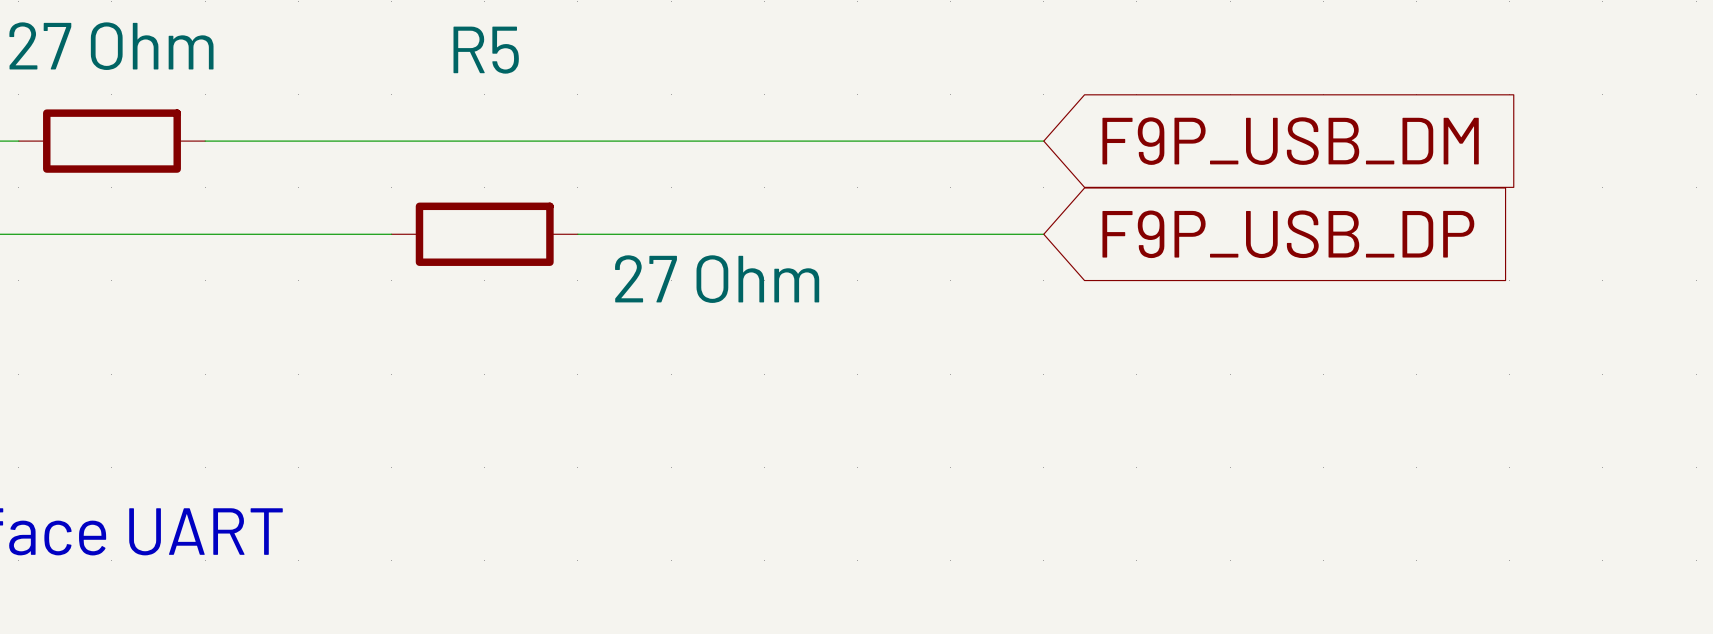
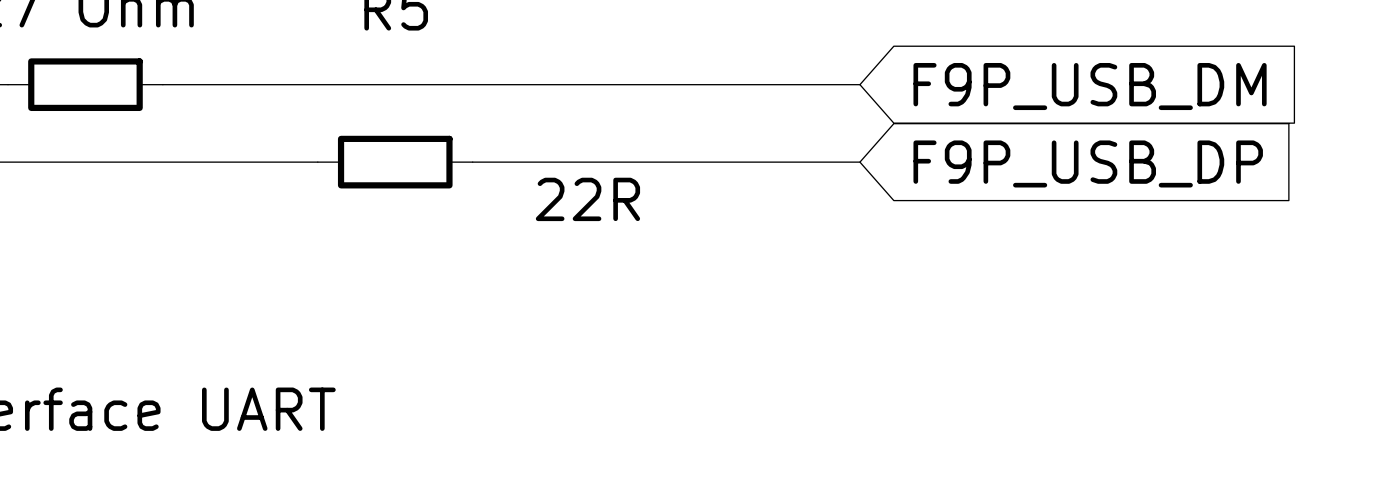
R5 value: 27 Ohm (717, 279) -> 22R (587, 199)

